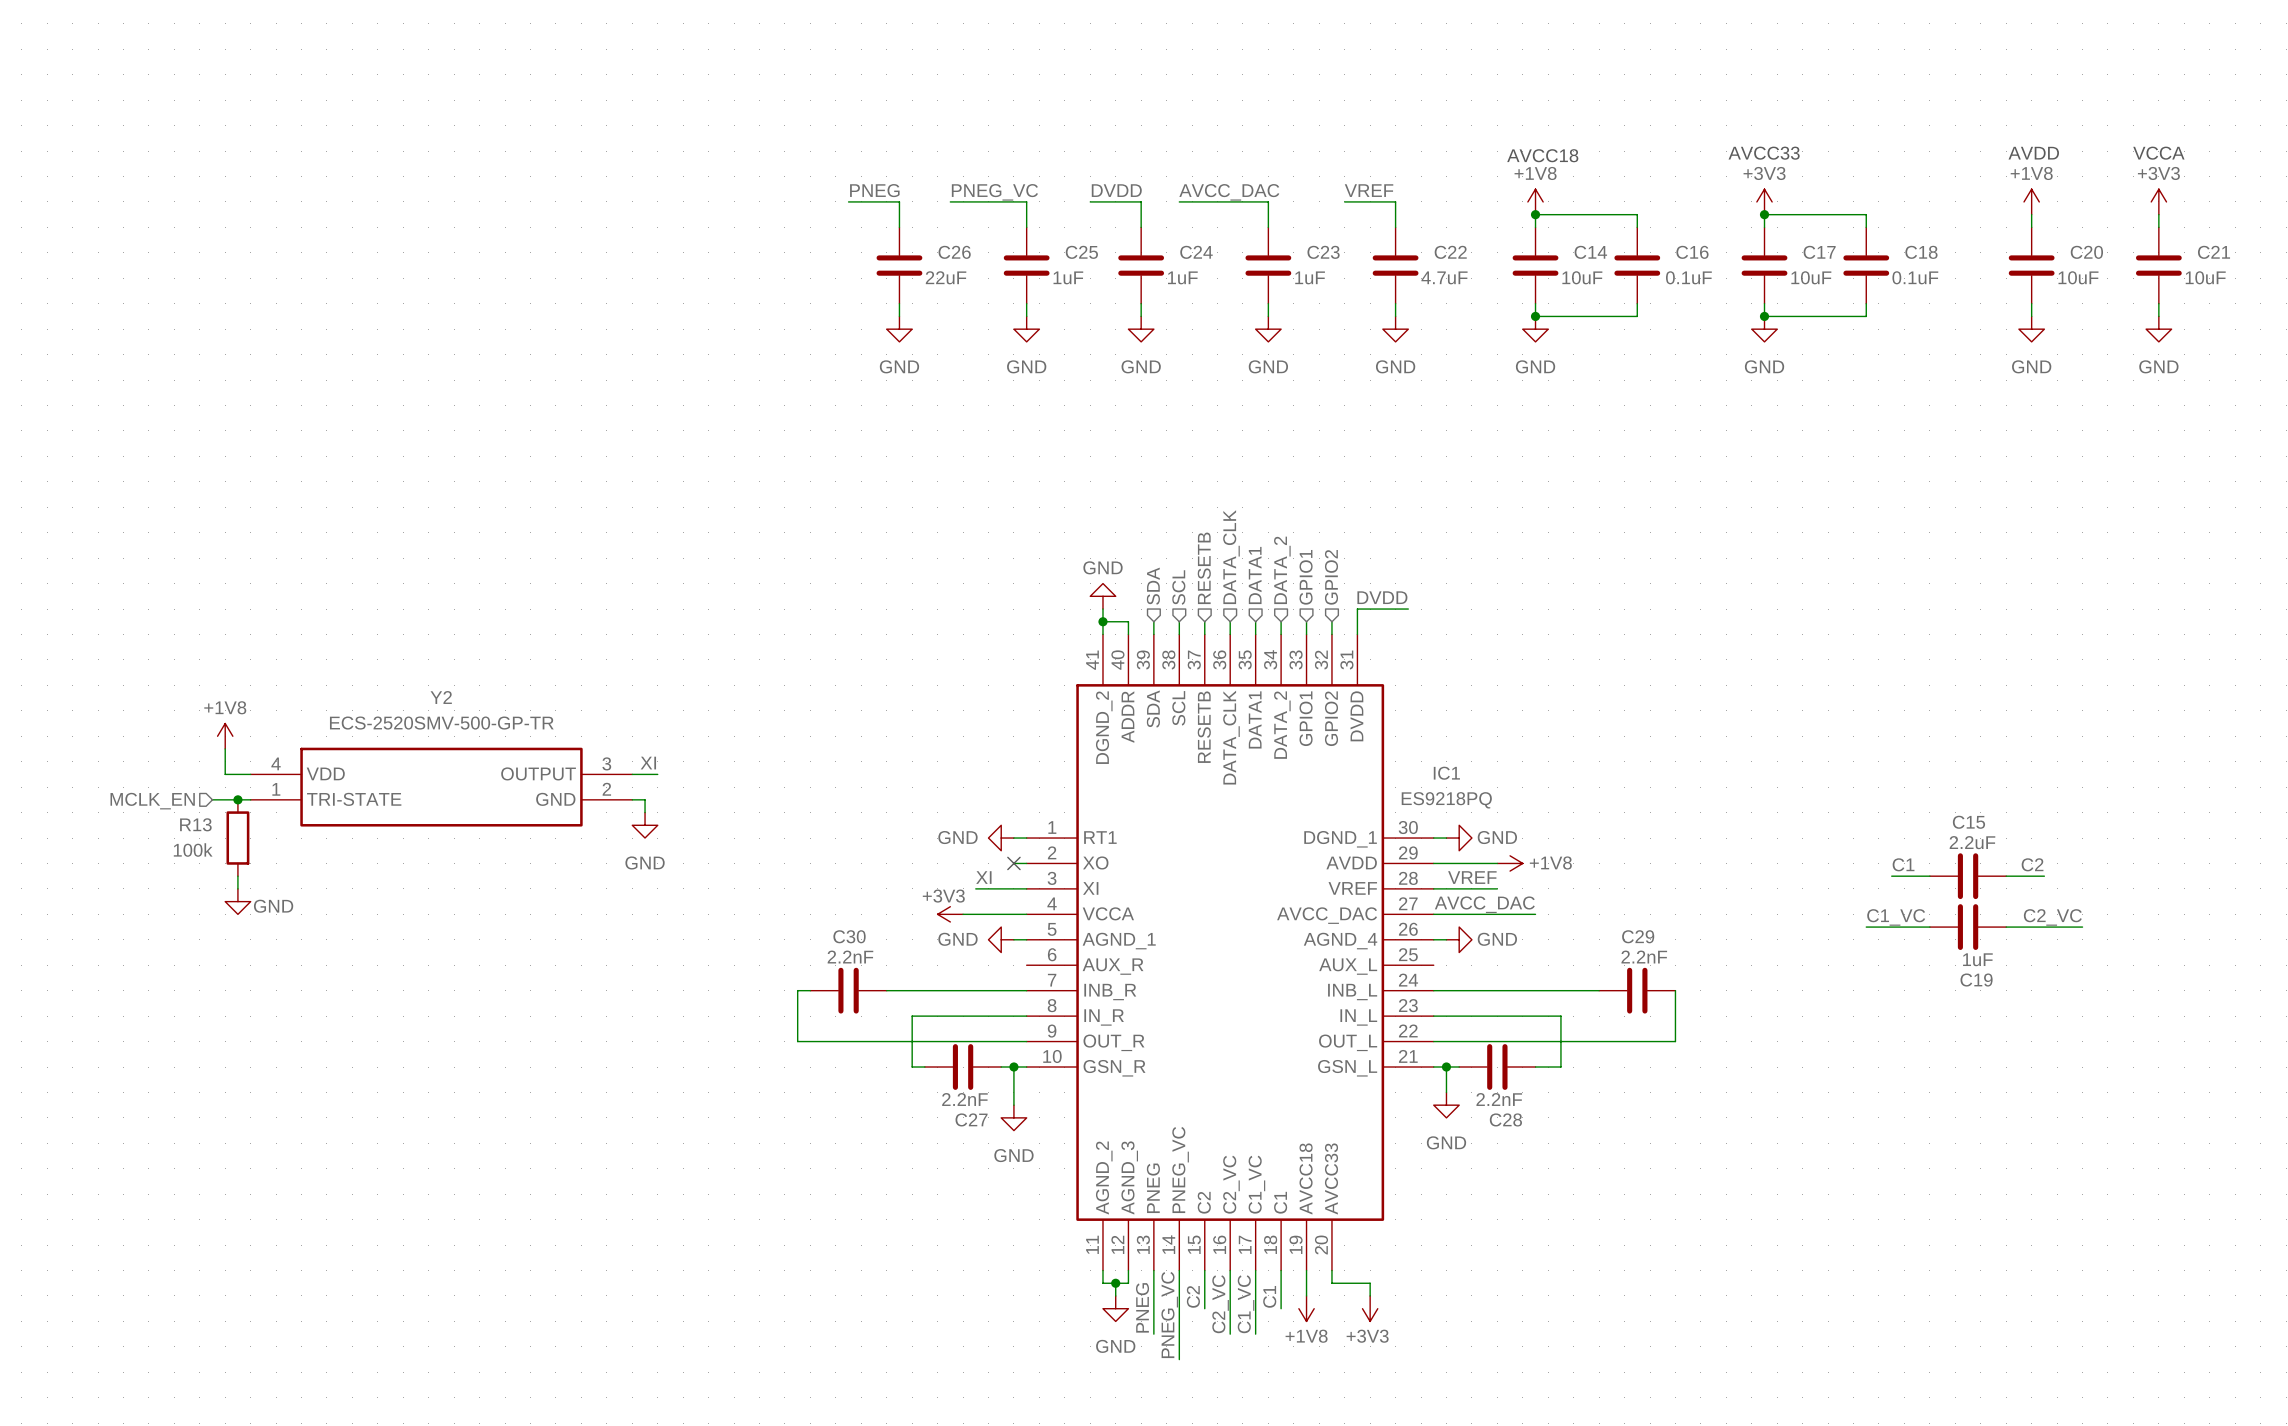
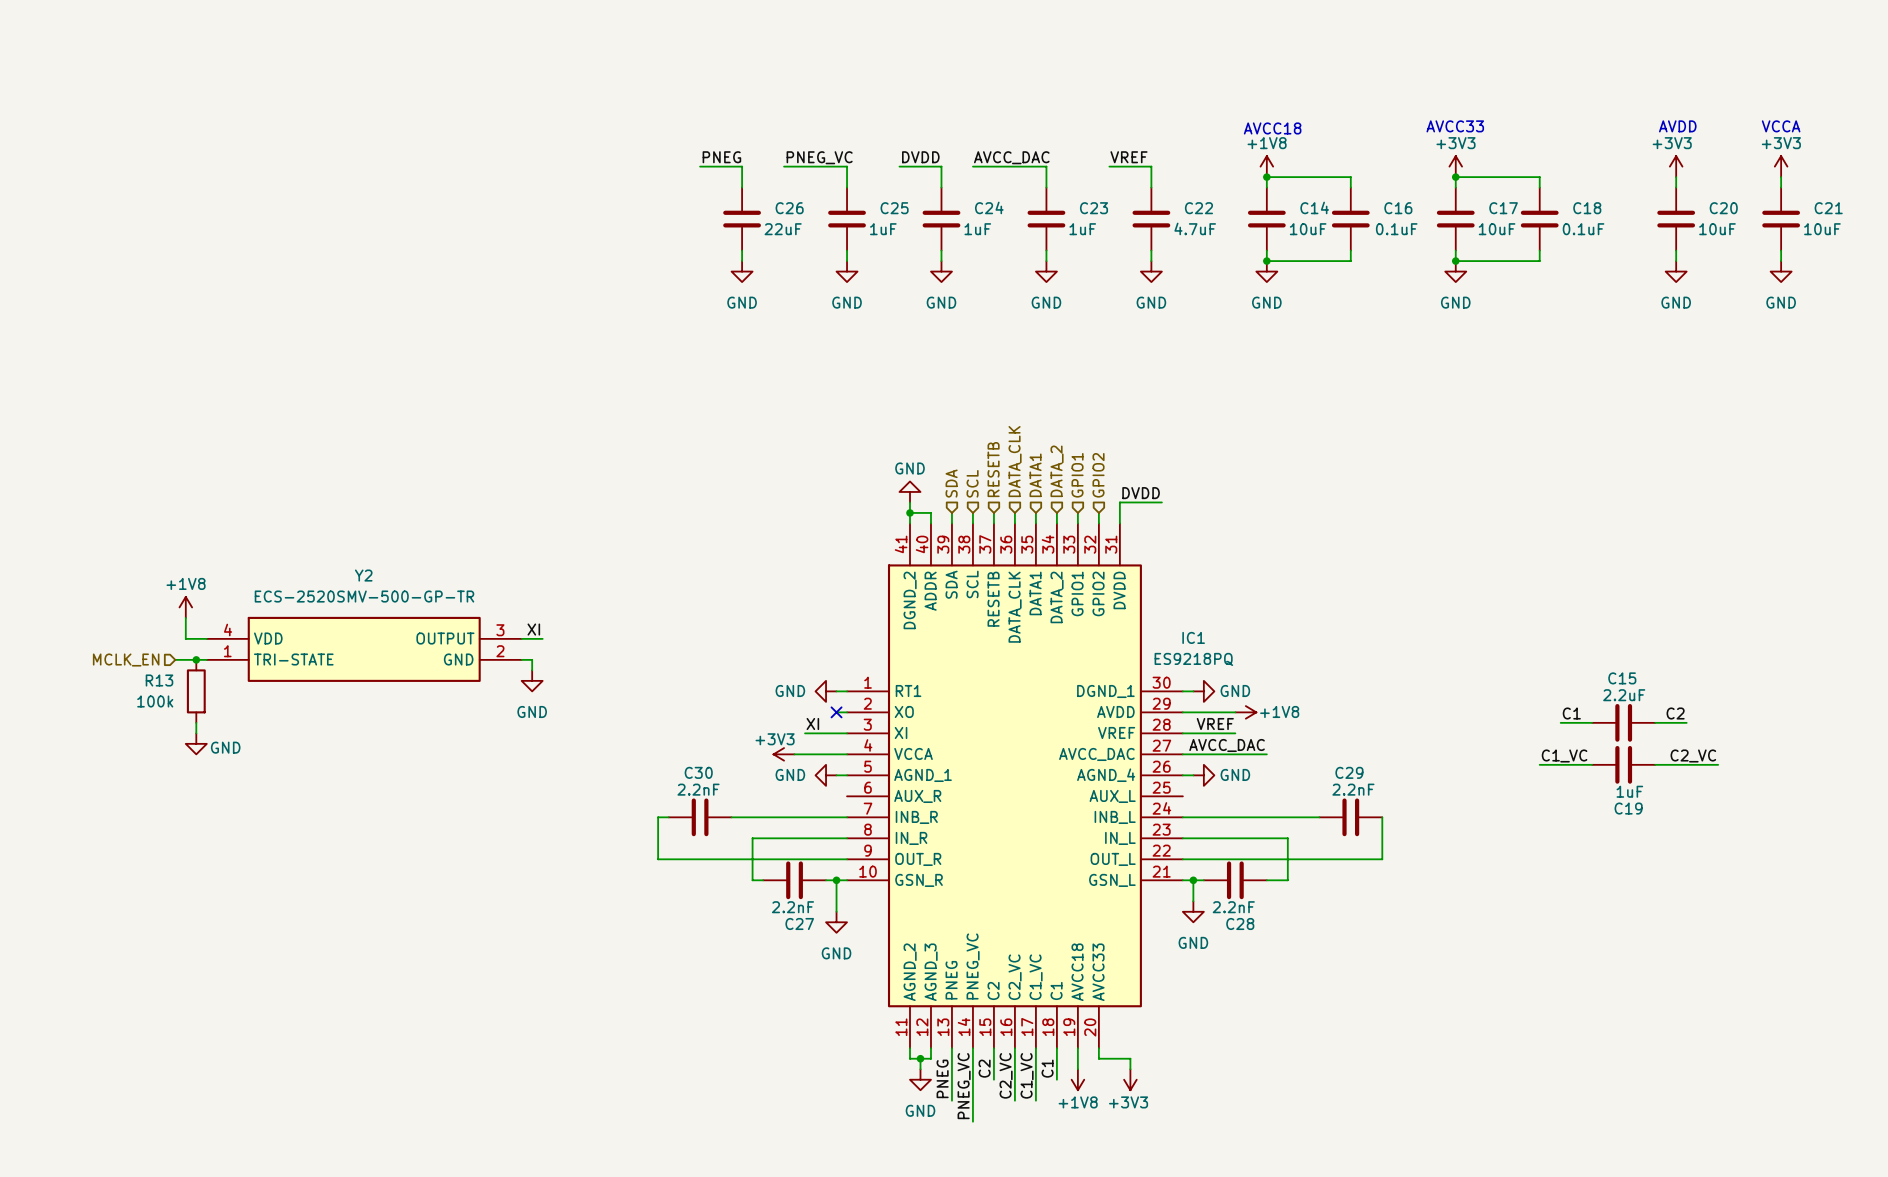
power symbol: +1V8 (2031, 201) -> +3V3 (1676, 166)

